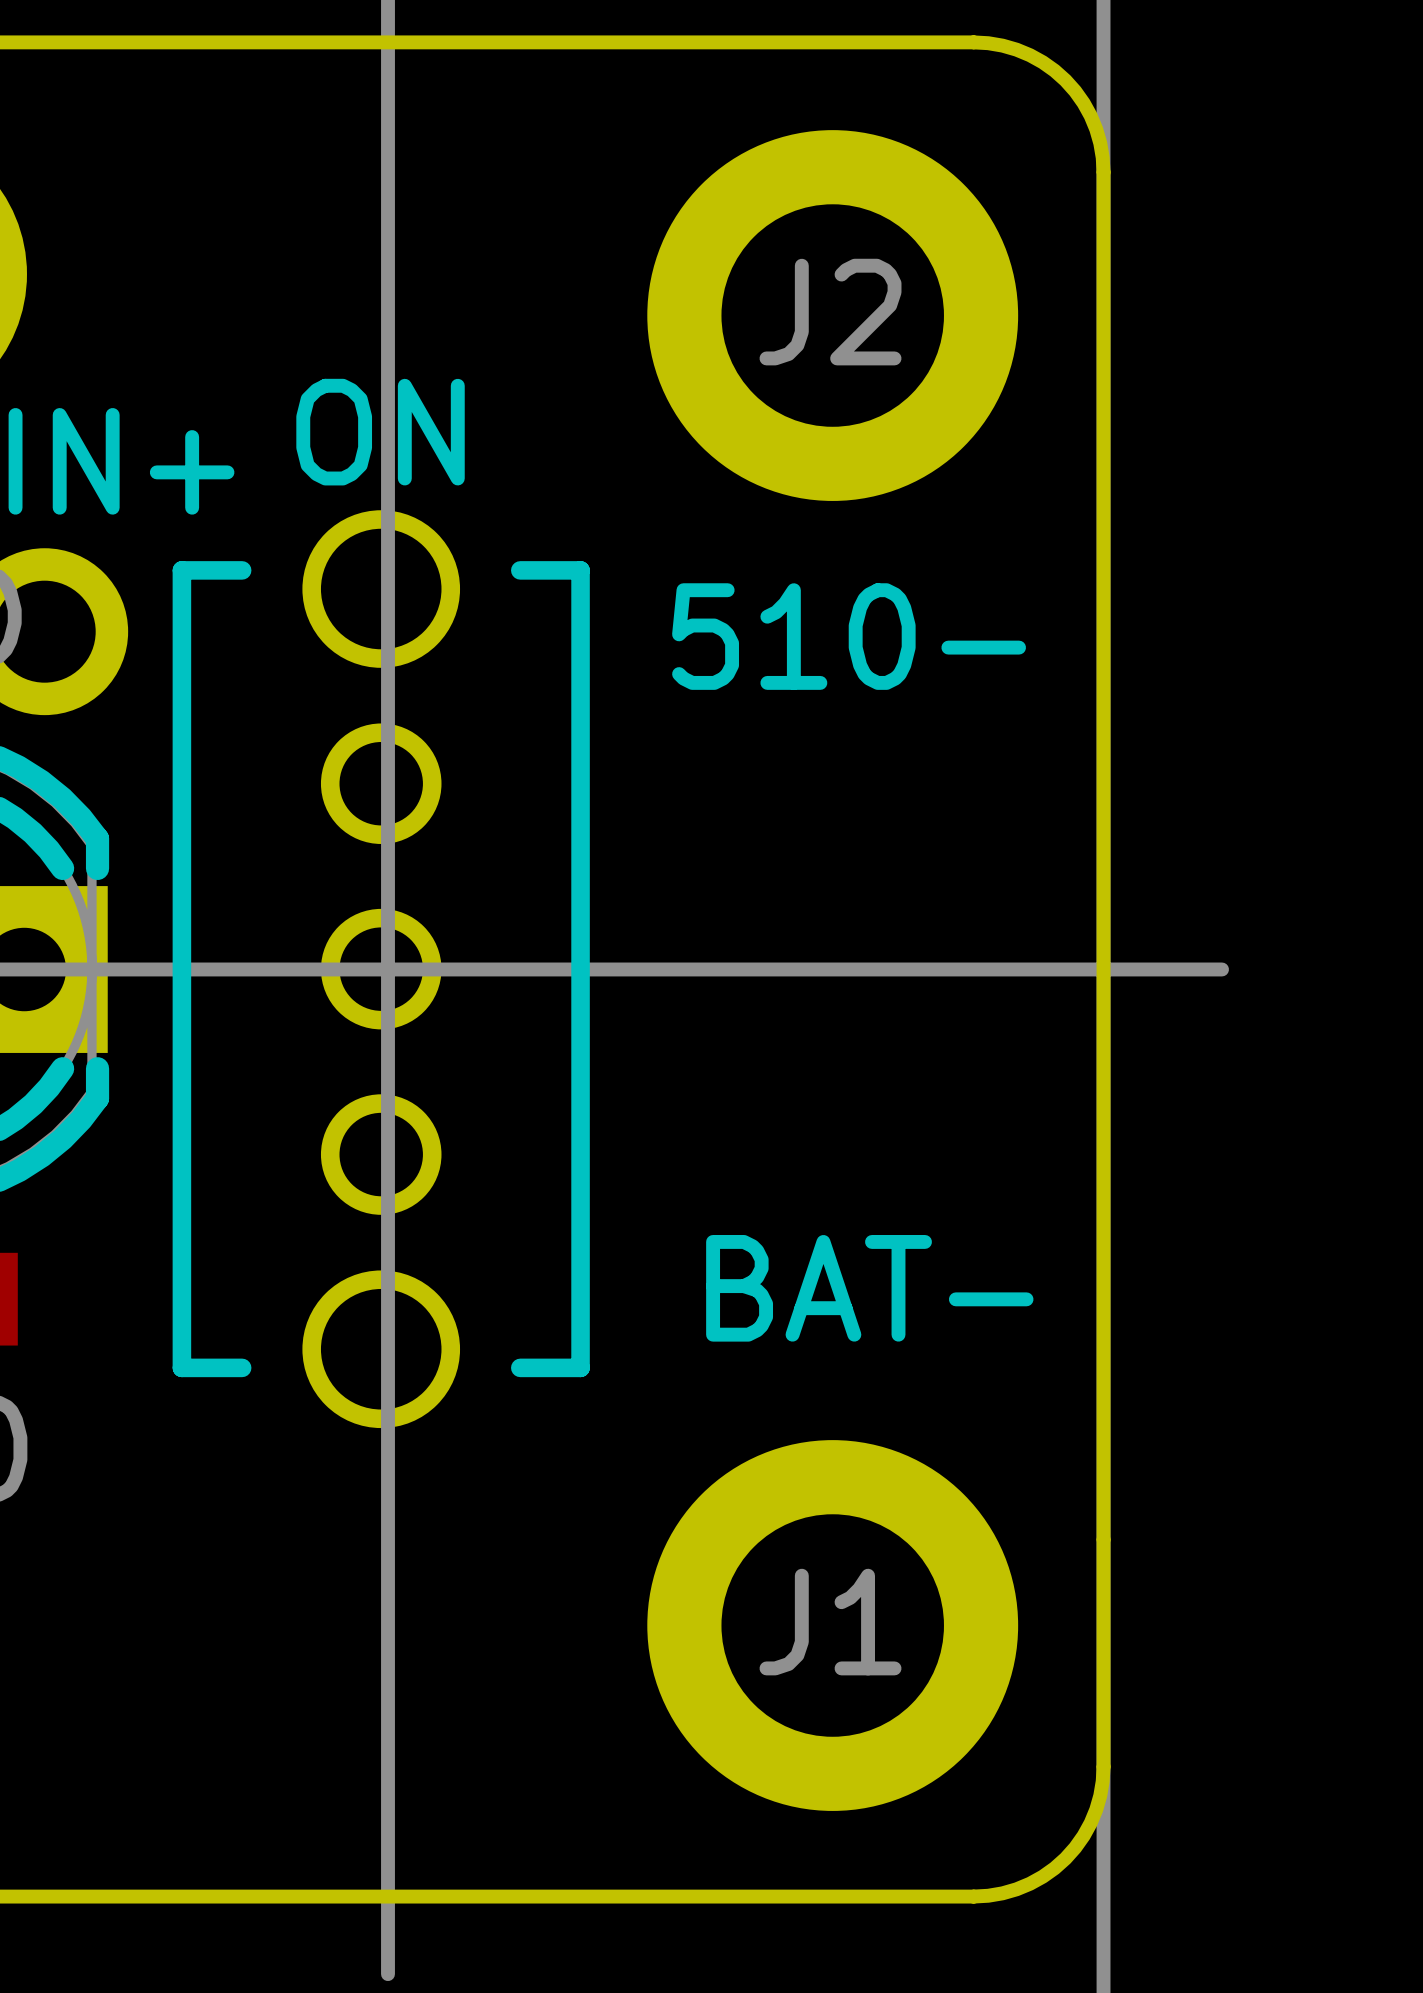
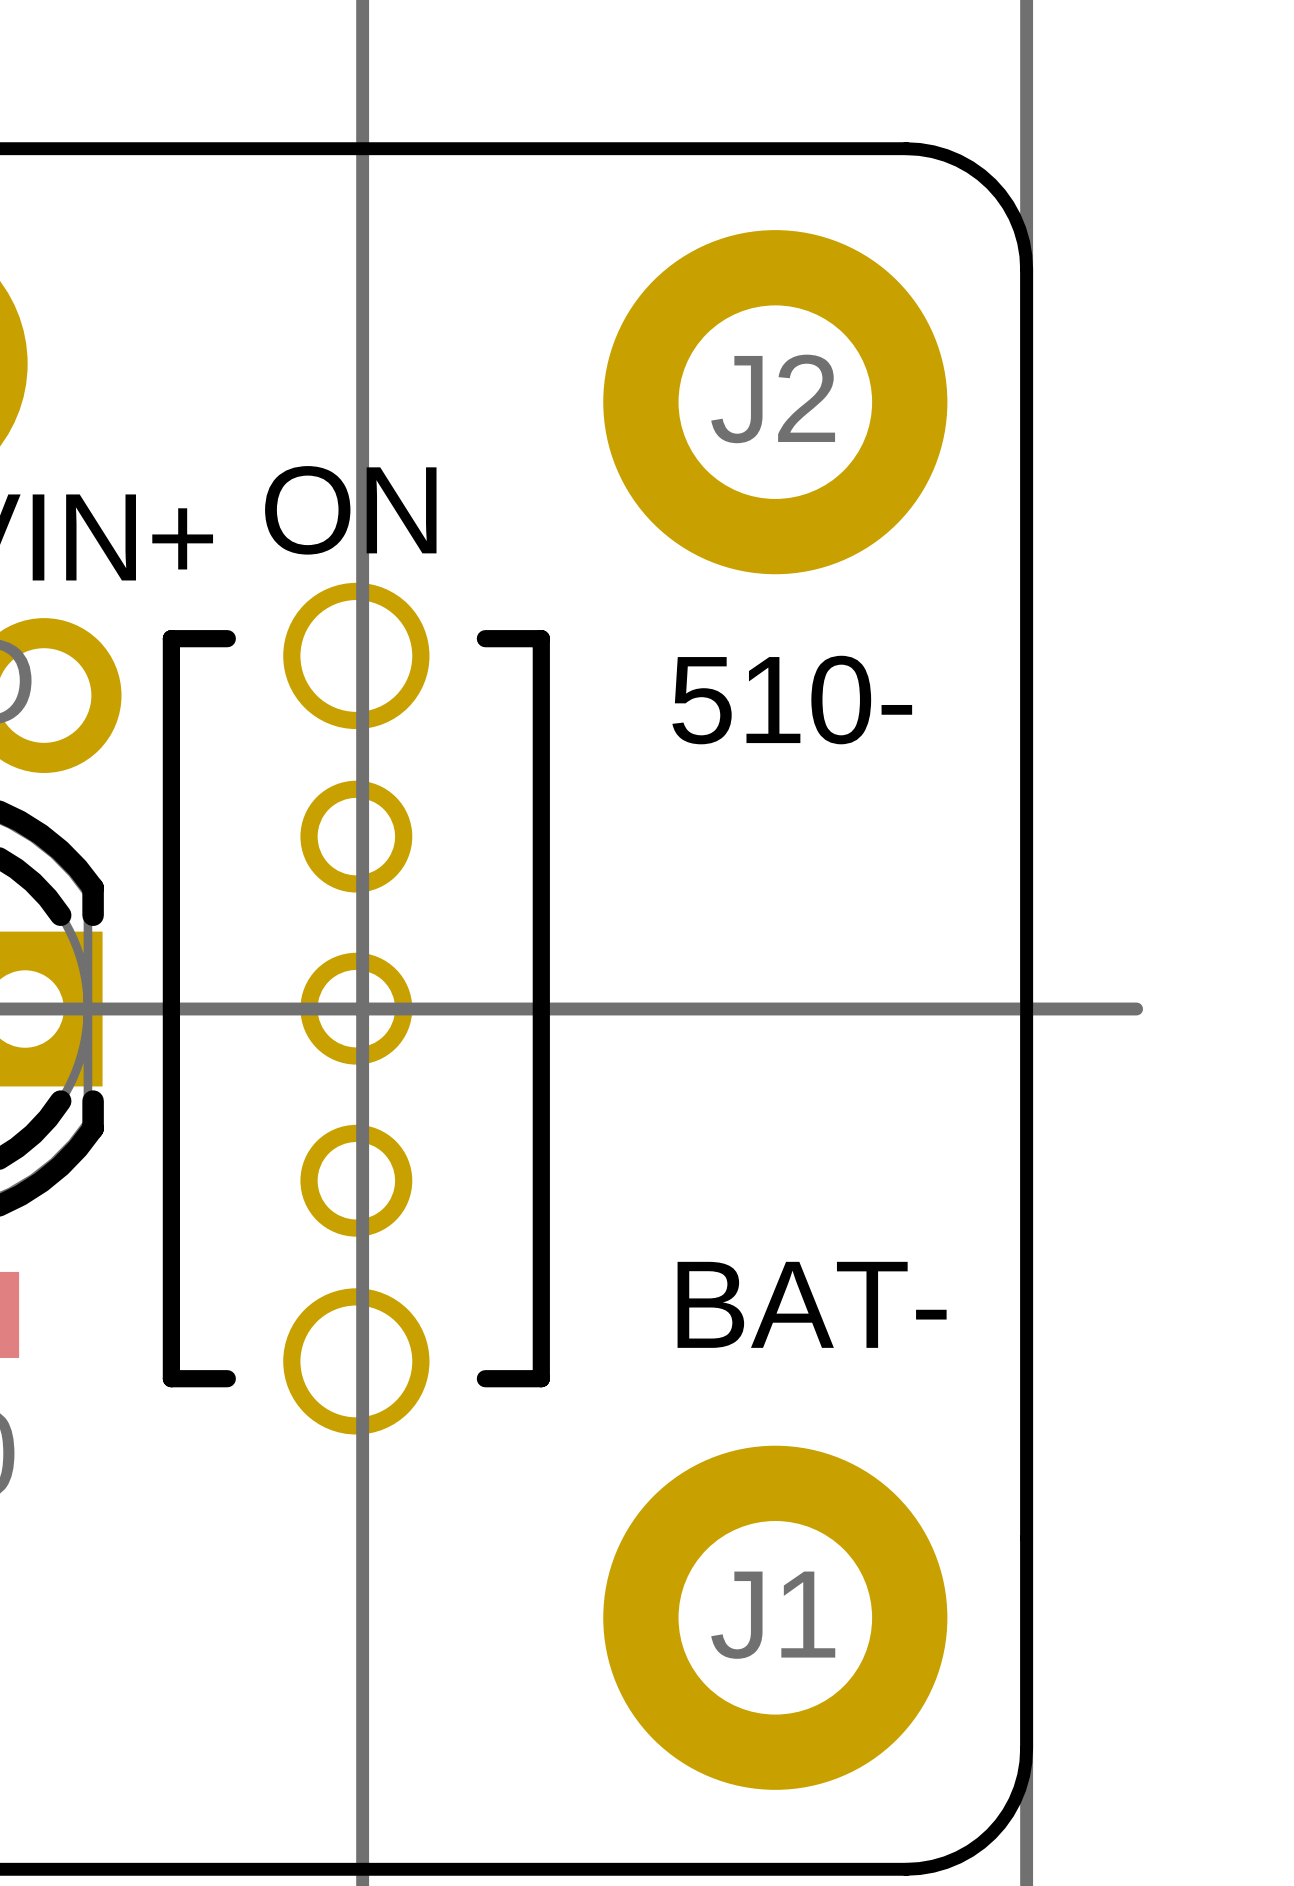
J2 footprint: [647, 130, 1019, 501] -> [603, 230, 948, 575]
J1 footprint: [647, 1440, 1019, 1811] -> [603, 1445, 948, 1790]

